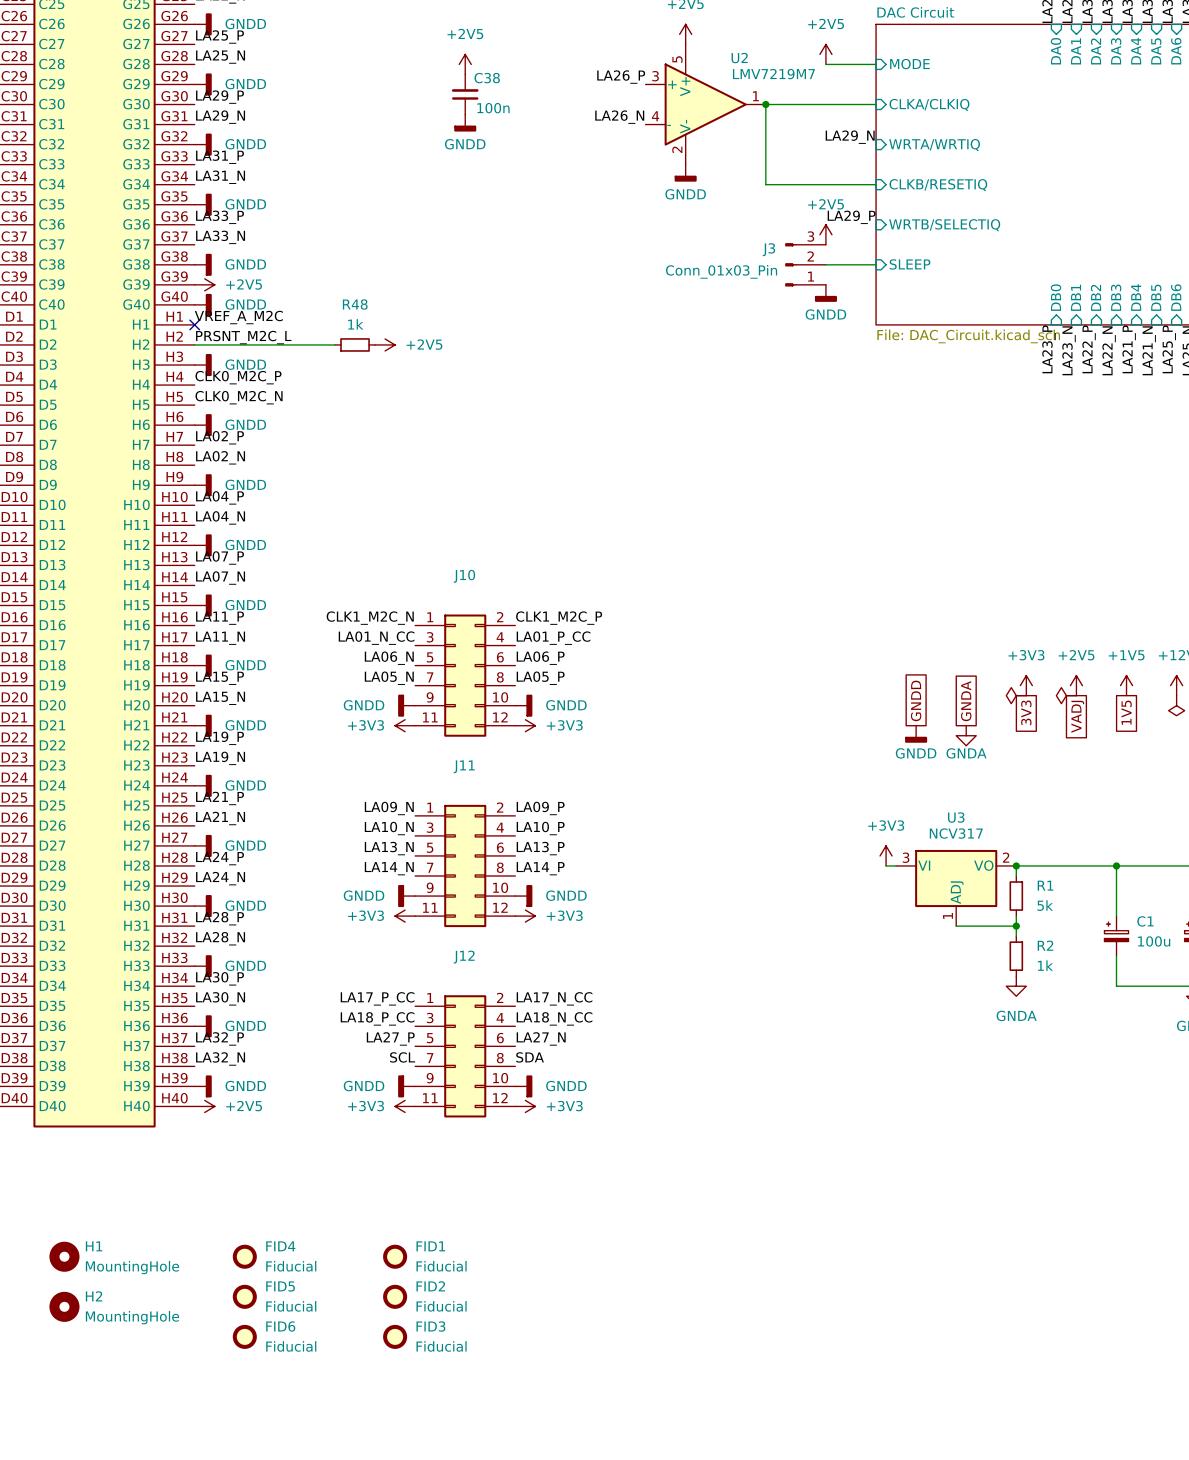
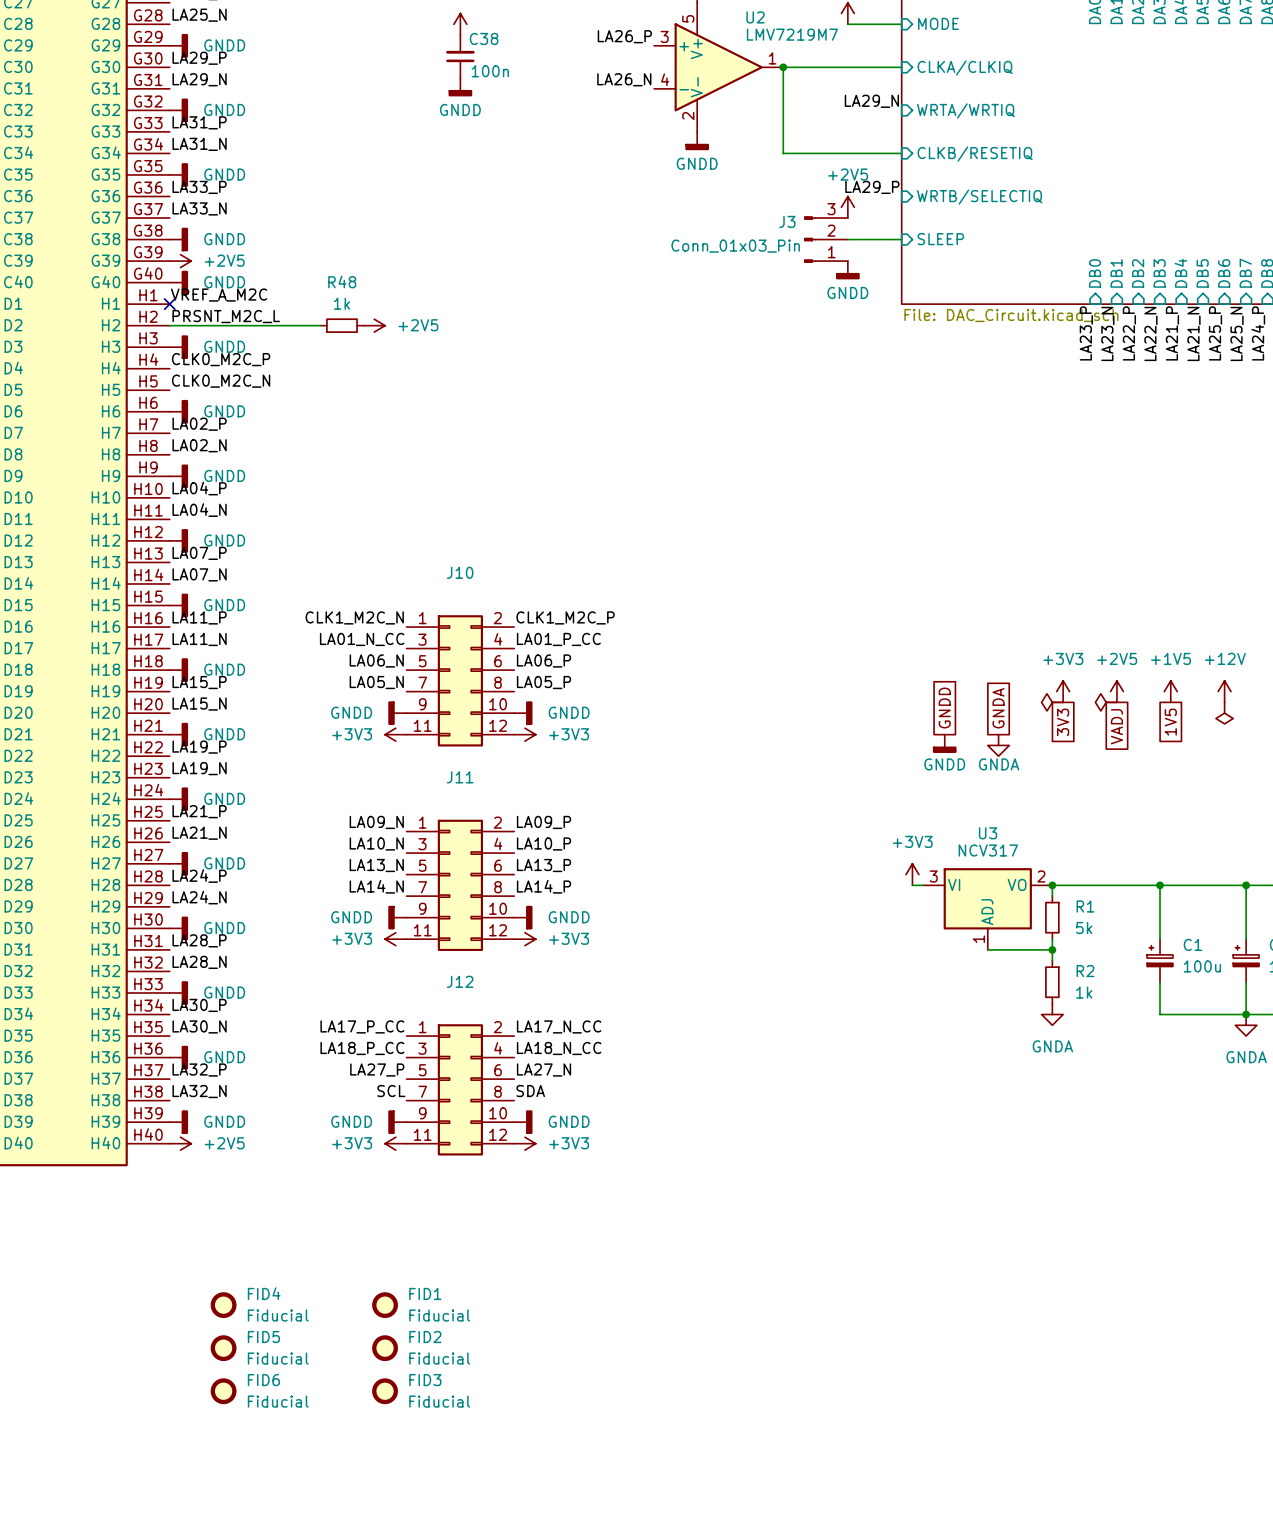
H1: MountingHole (64, 1256) -> none
H2: MountingHole (64, 1306) -> none

